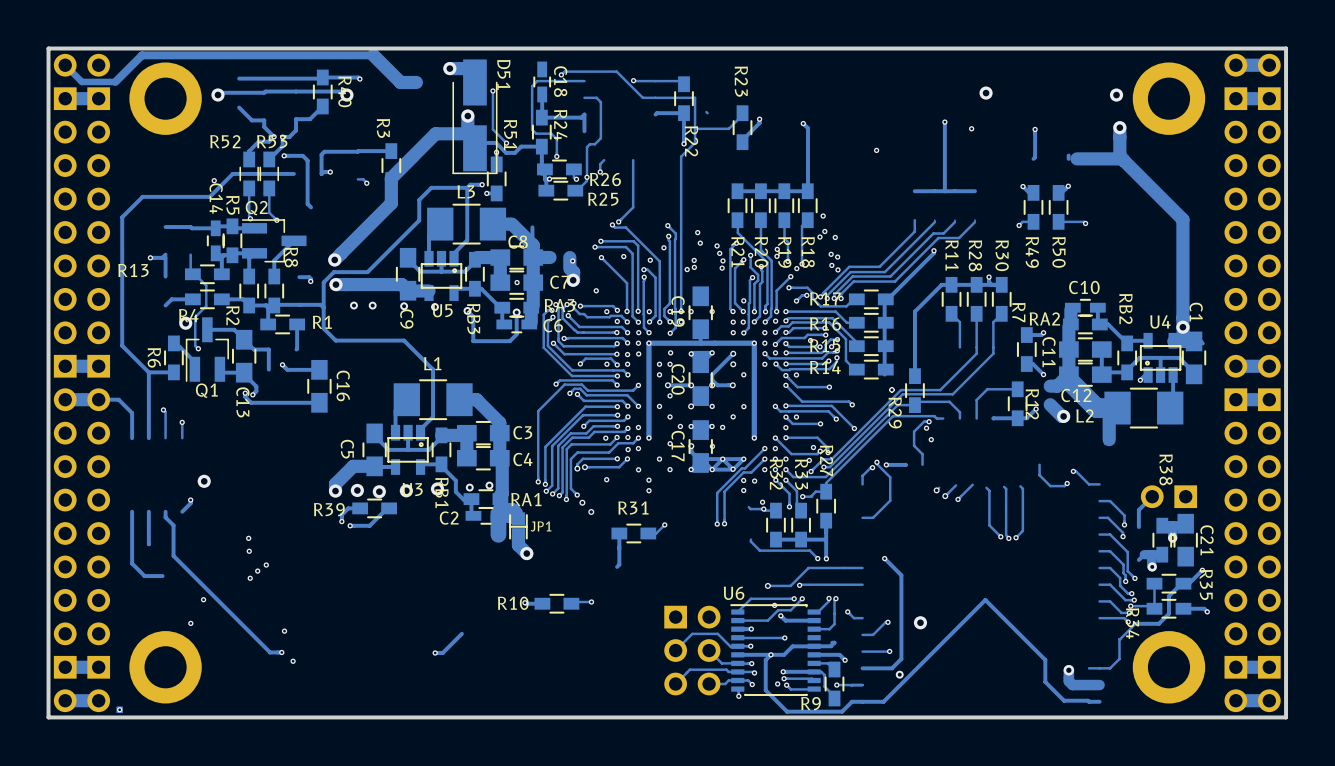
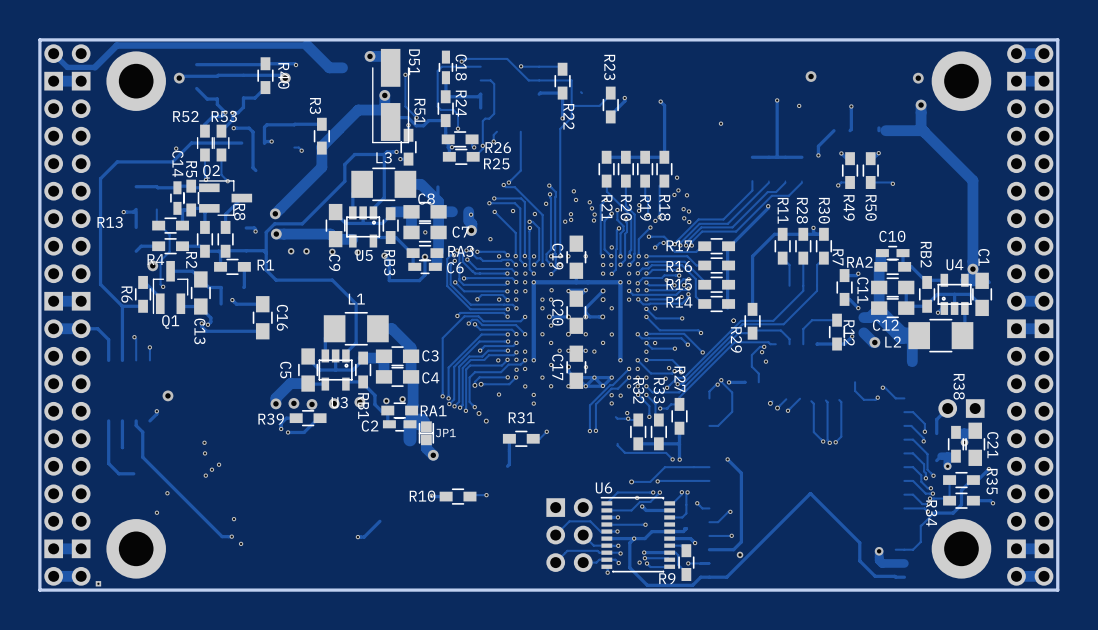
track: none -> (833, 130) (818, 146) (818, 155)
via: none -> (818, 155)
via: (920, 622) -> none

